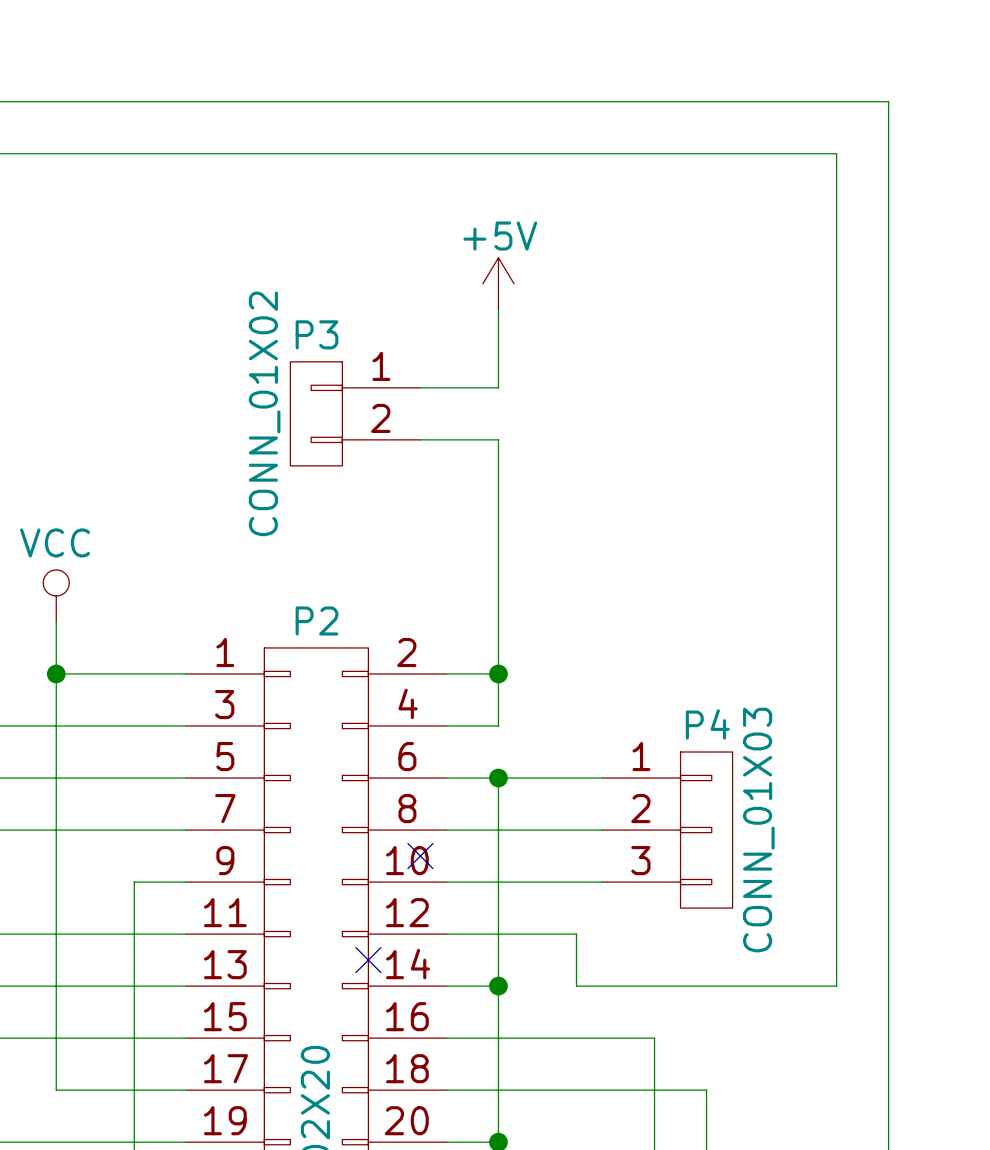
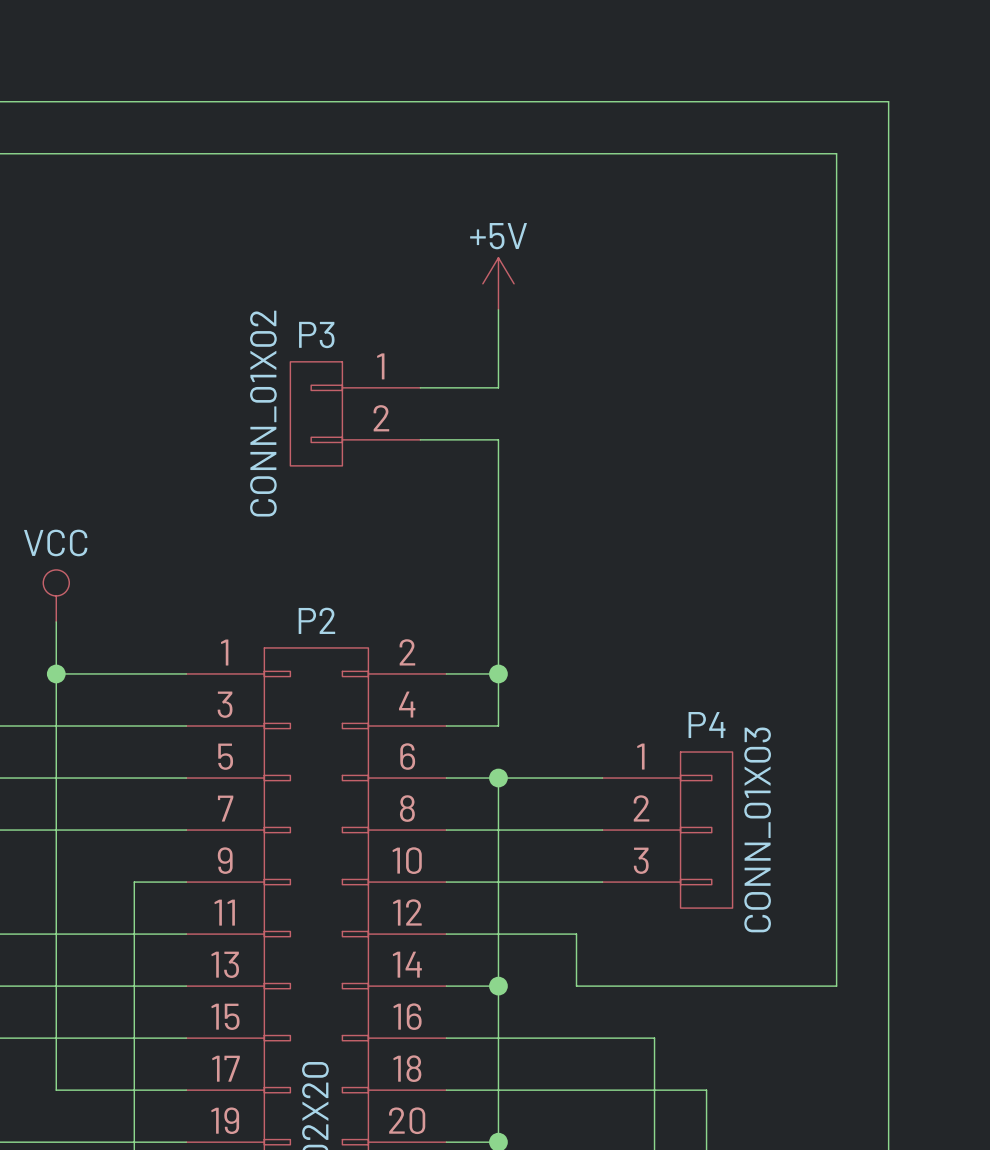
no-connect mark: (420, 856) -> none
no-connect mark: (368, 960) -> none

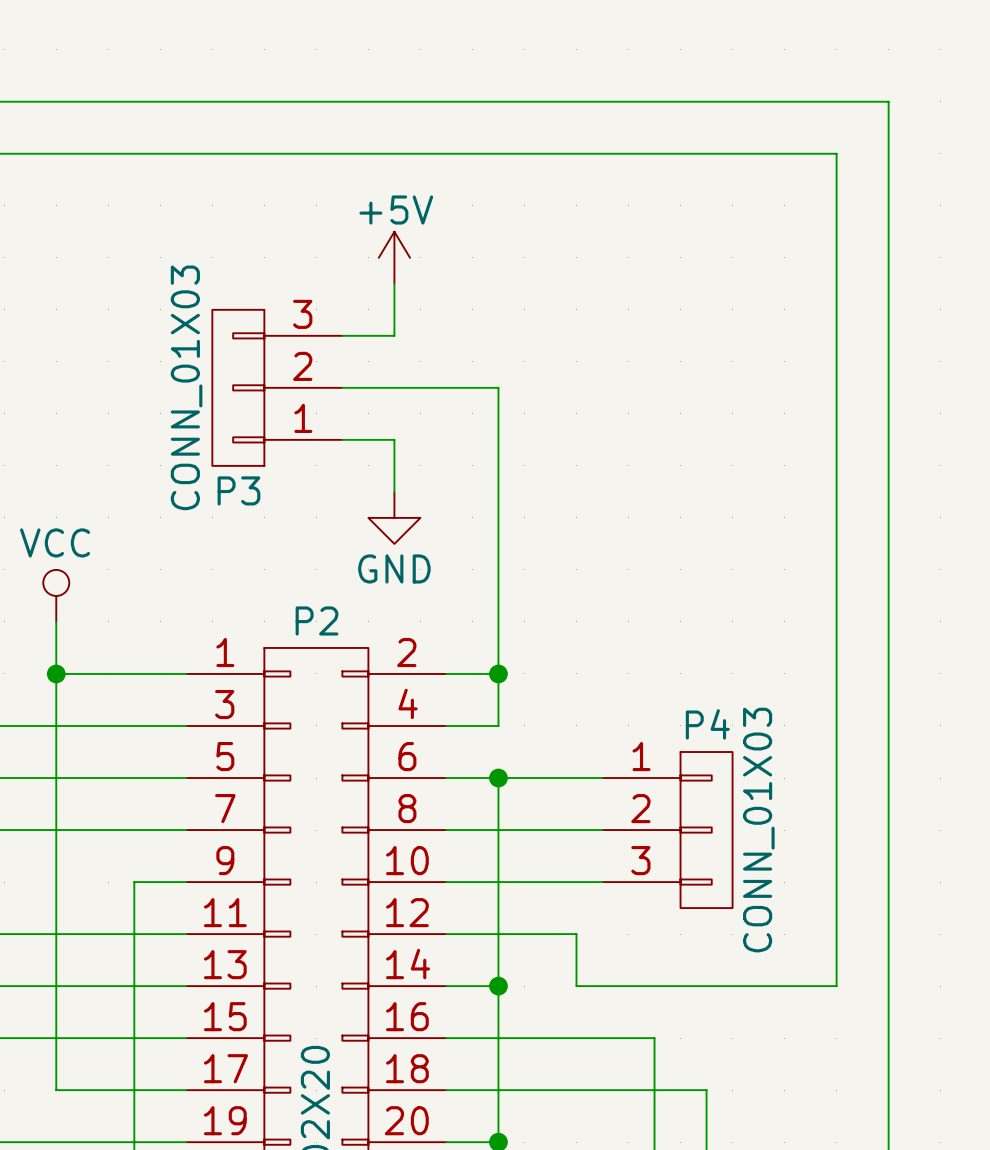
wire: none -> (394, 283) (394, 335) (342, 335)
power symbol position: +5V (498, 283) -> +5V (394, 257)
wire: (498, 309) (498, 387) -> none
P3 name position: P3 (316, 334) -> P3 (238, 490)
P3 symbol: [290, 361, 421, 466] -> [212, 309, 343, 466]
P3 value: CONN_01X02 (263, 413) -> CONN_01X03 (186, 387)
wire: none -> (342, 439) (394, 439) (394, 491)
wire: (420, 439) (498, 439) -> (498, 387) (498, 439)
power symbol: none -> GND (394, 517)

